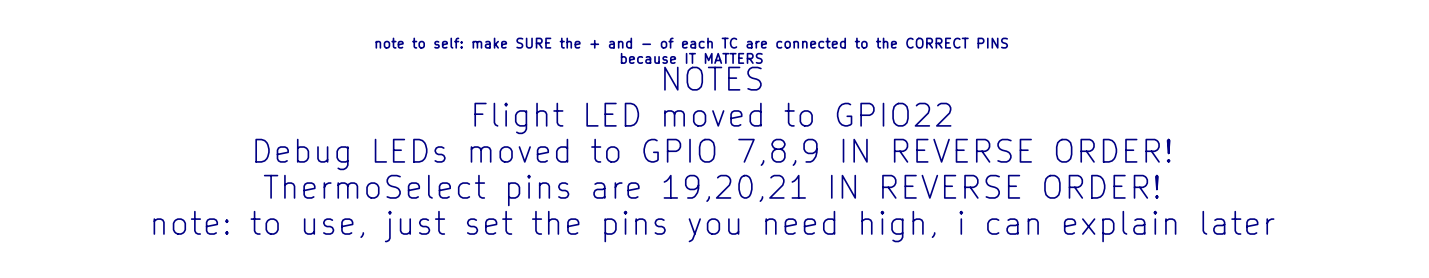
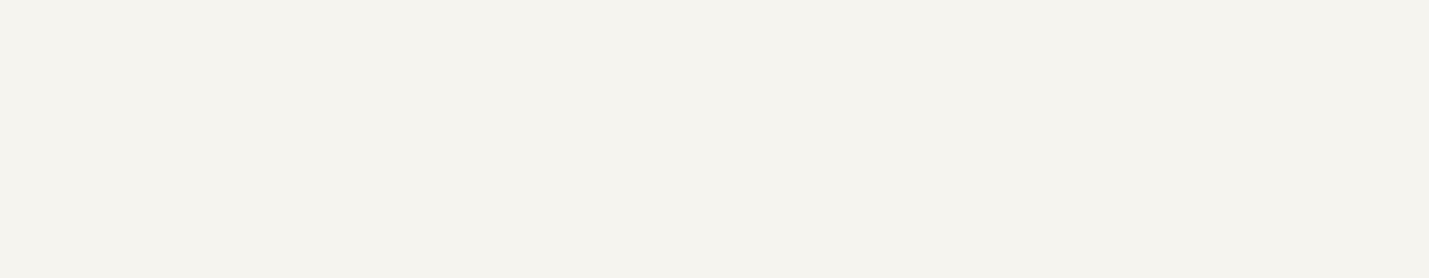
text: note to self: make SURE the + and - of each TC are connected to the CORRECT PINS (691, 43) -> none
text: because IT MATTERS (691, 58) -> none
text: NOTES (712, 78) -> none
text: Flight LED moved to GPIO22 (712, 118) -> none
text: Debug LEDs moved to GPIO 7,8,9 IN REVERSE ORDER! (712, 154) -> none
text: ThermoSelect pins are 19,20,21 IN REVERSE ORDER! (711, 190) -> none
text: note: to use, just set the pins you need high, i can explain later (713, 226) -> none

